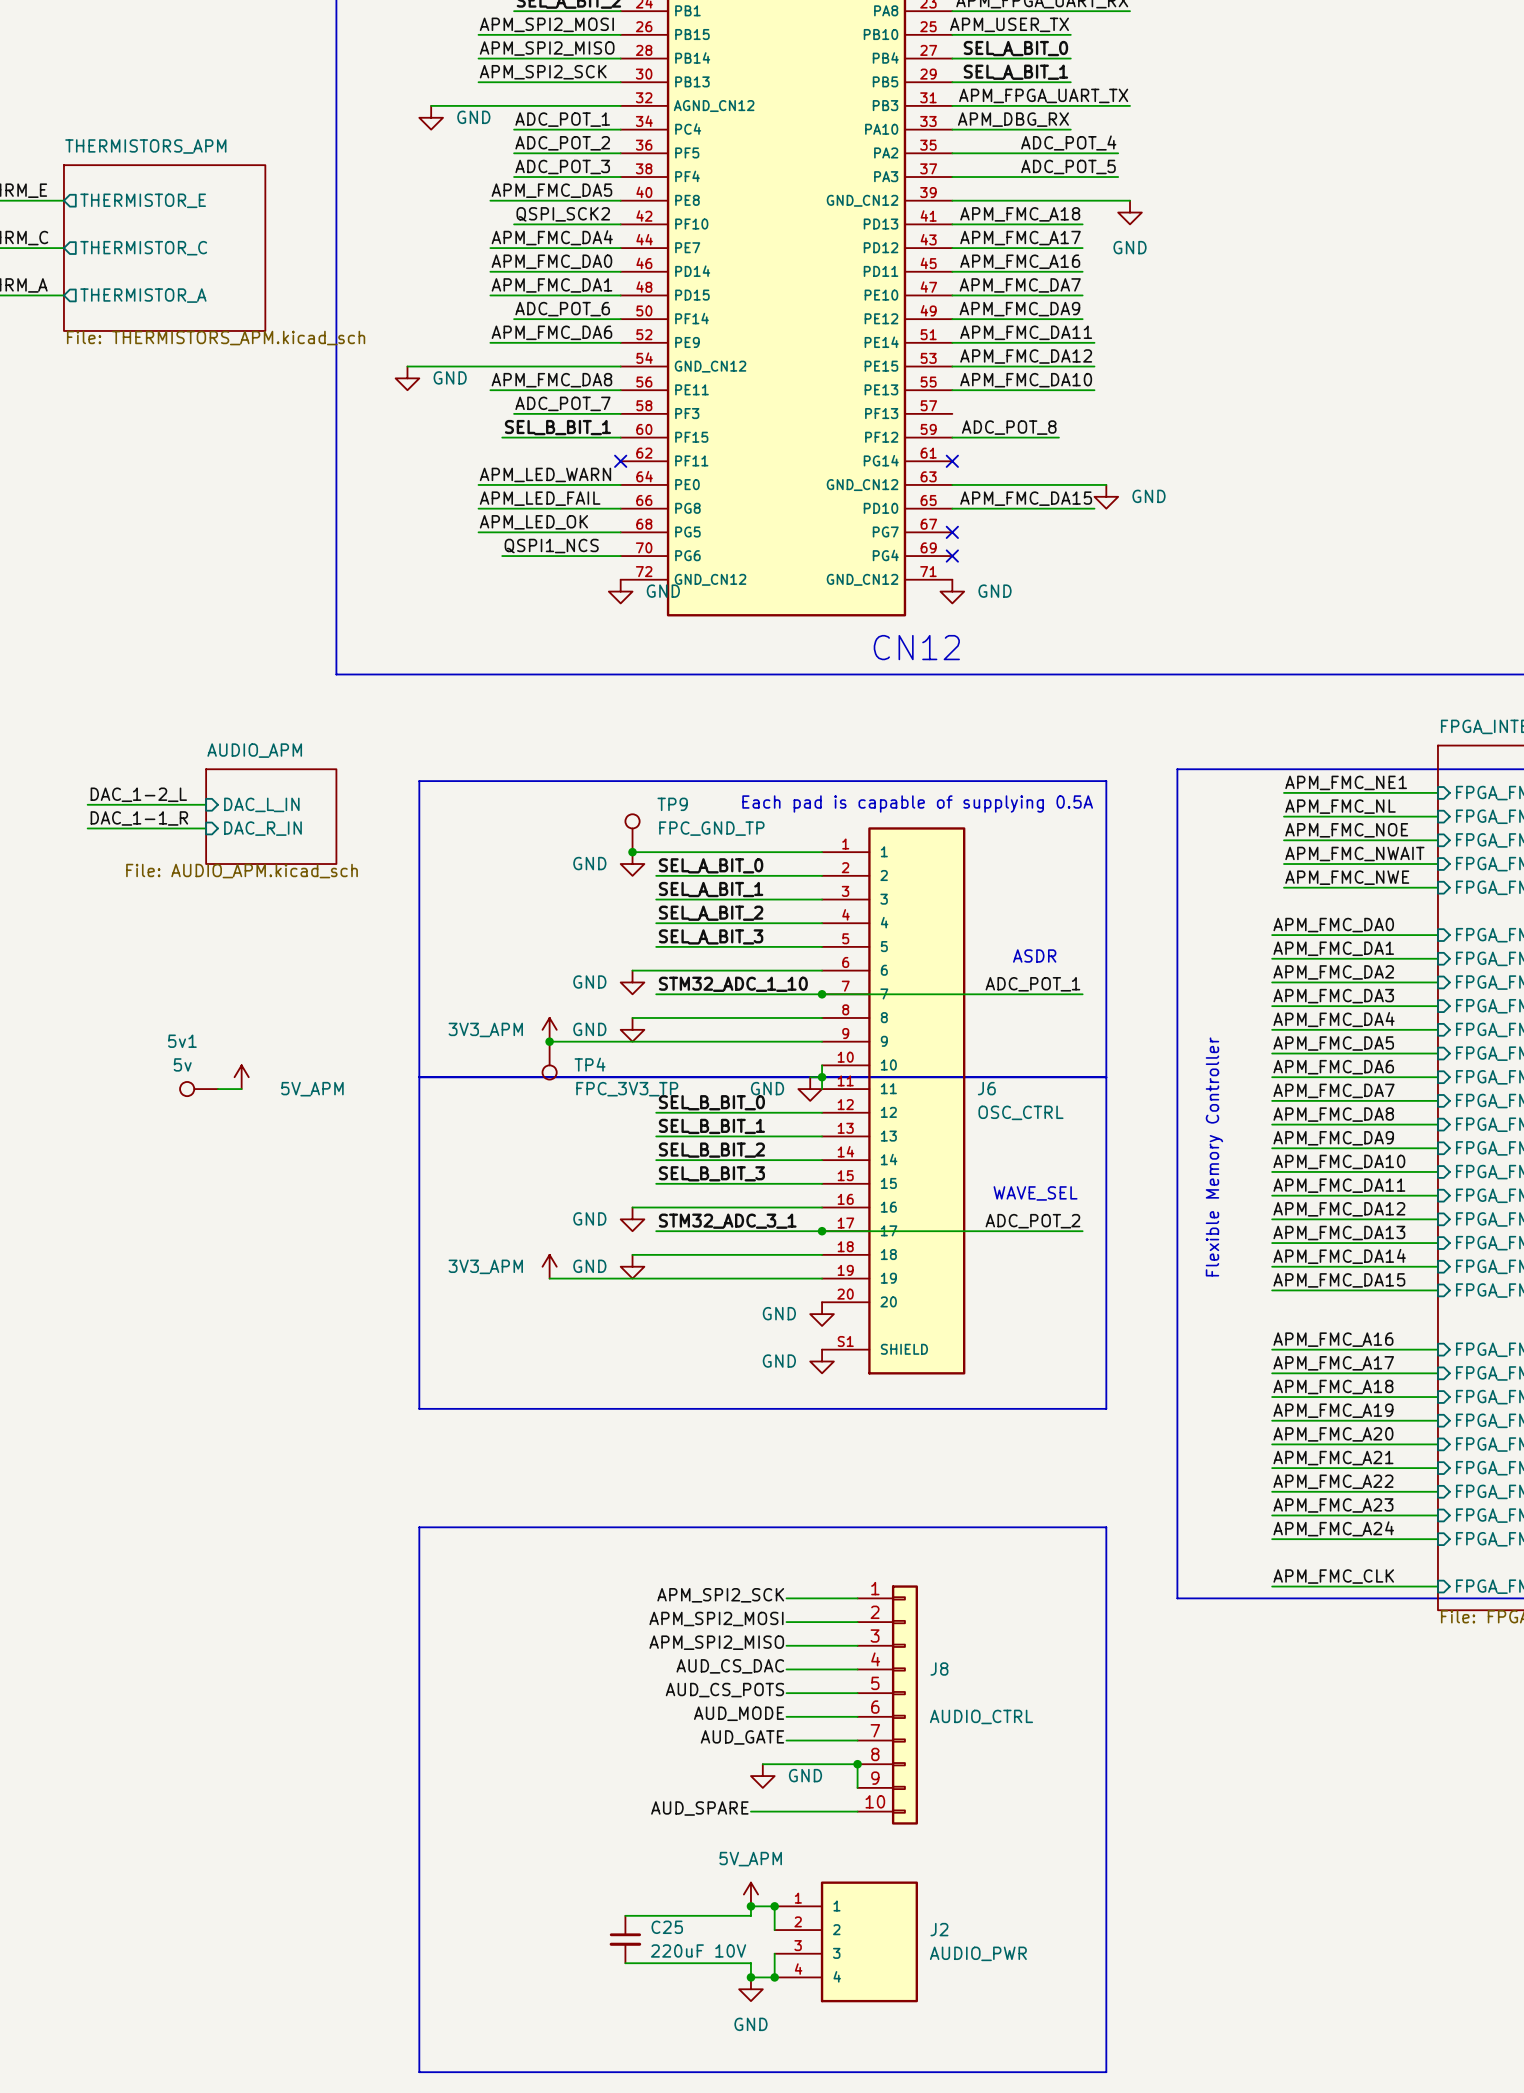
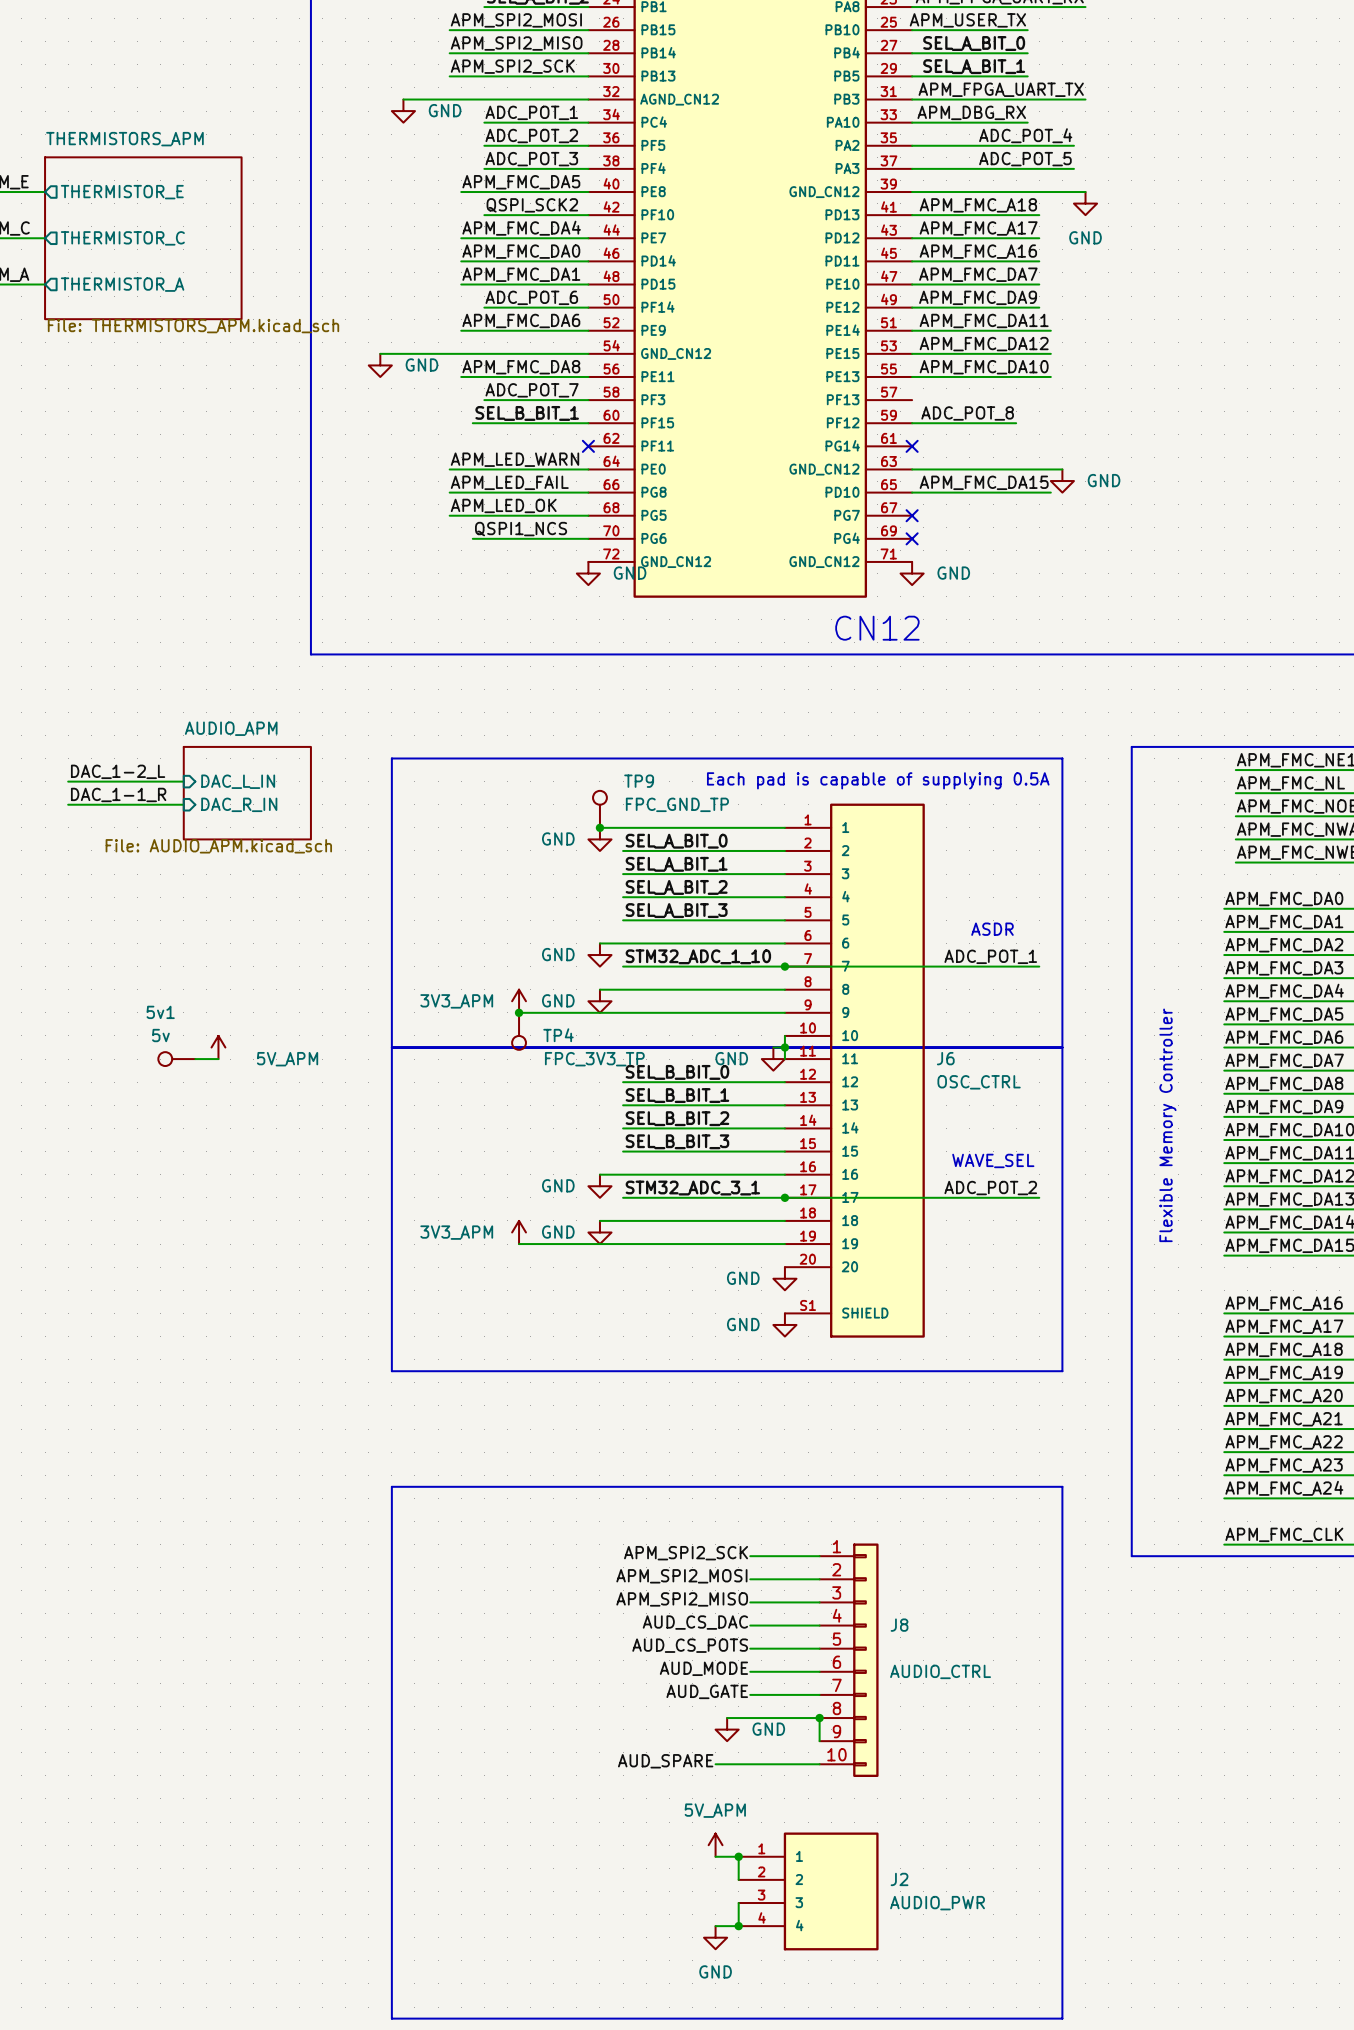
wire: (750, 1906) (750, 1915) (625, 1915) -> none
junction: (750, 1906) -> none
C25: 220uF 10V (625, 1939) -> none
wire: (625, 1963) (750, 1963) (750, 1977) -> none
junction: (750, 1977) -> none

